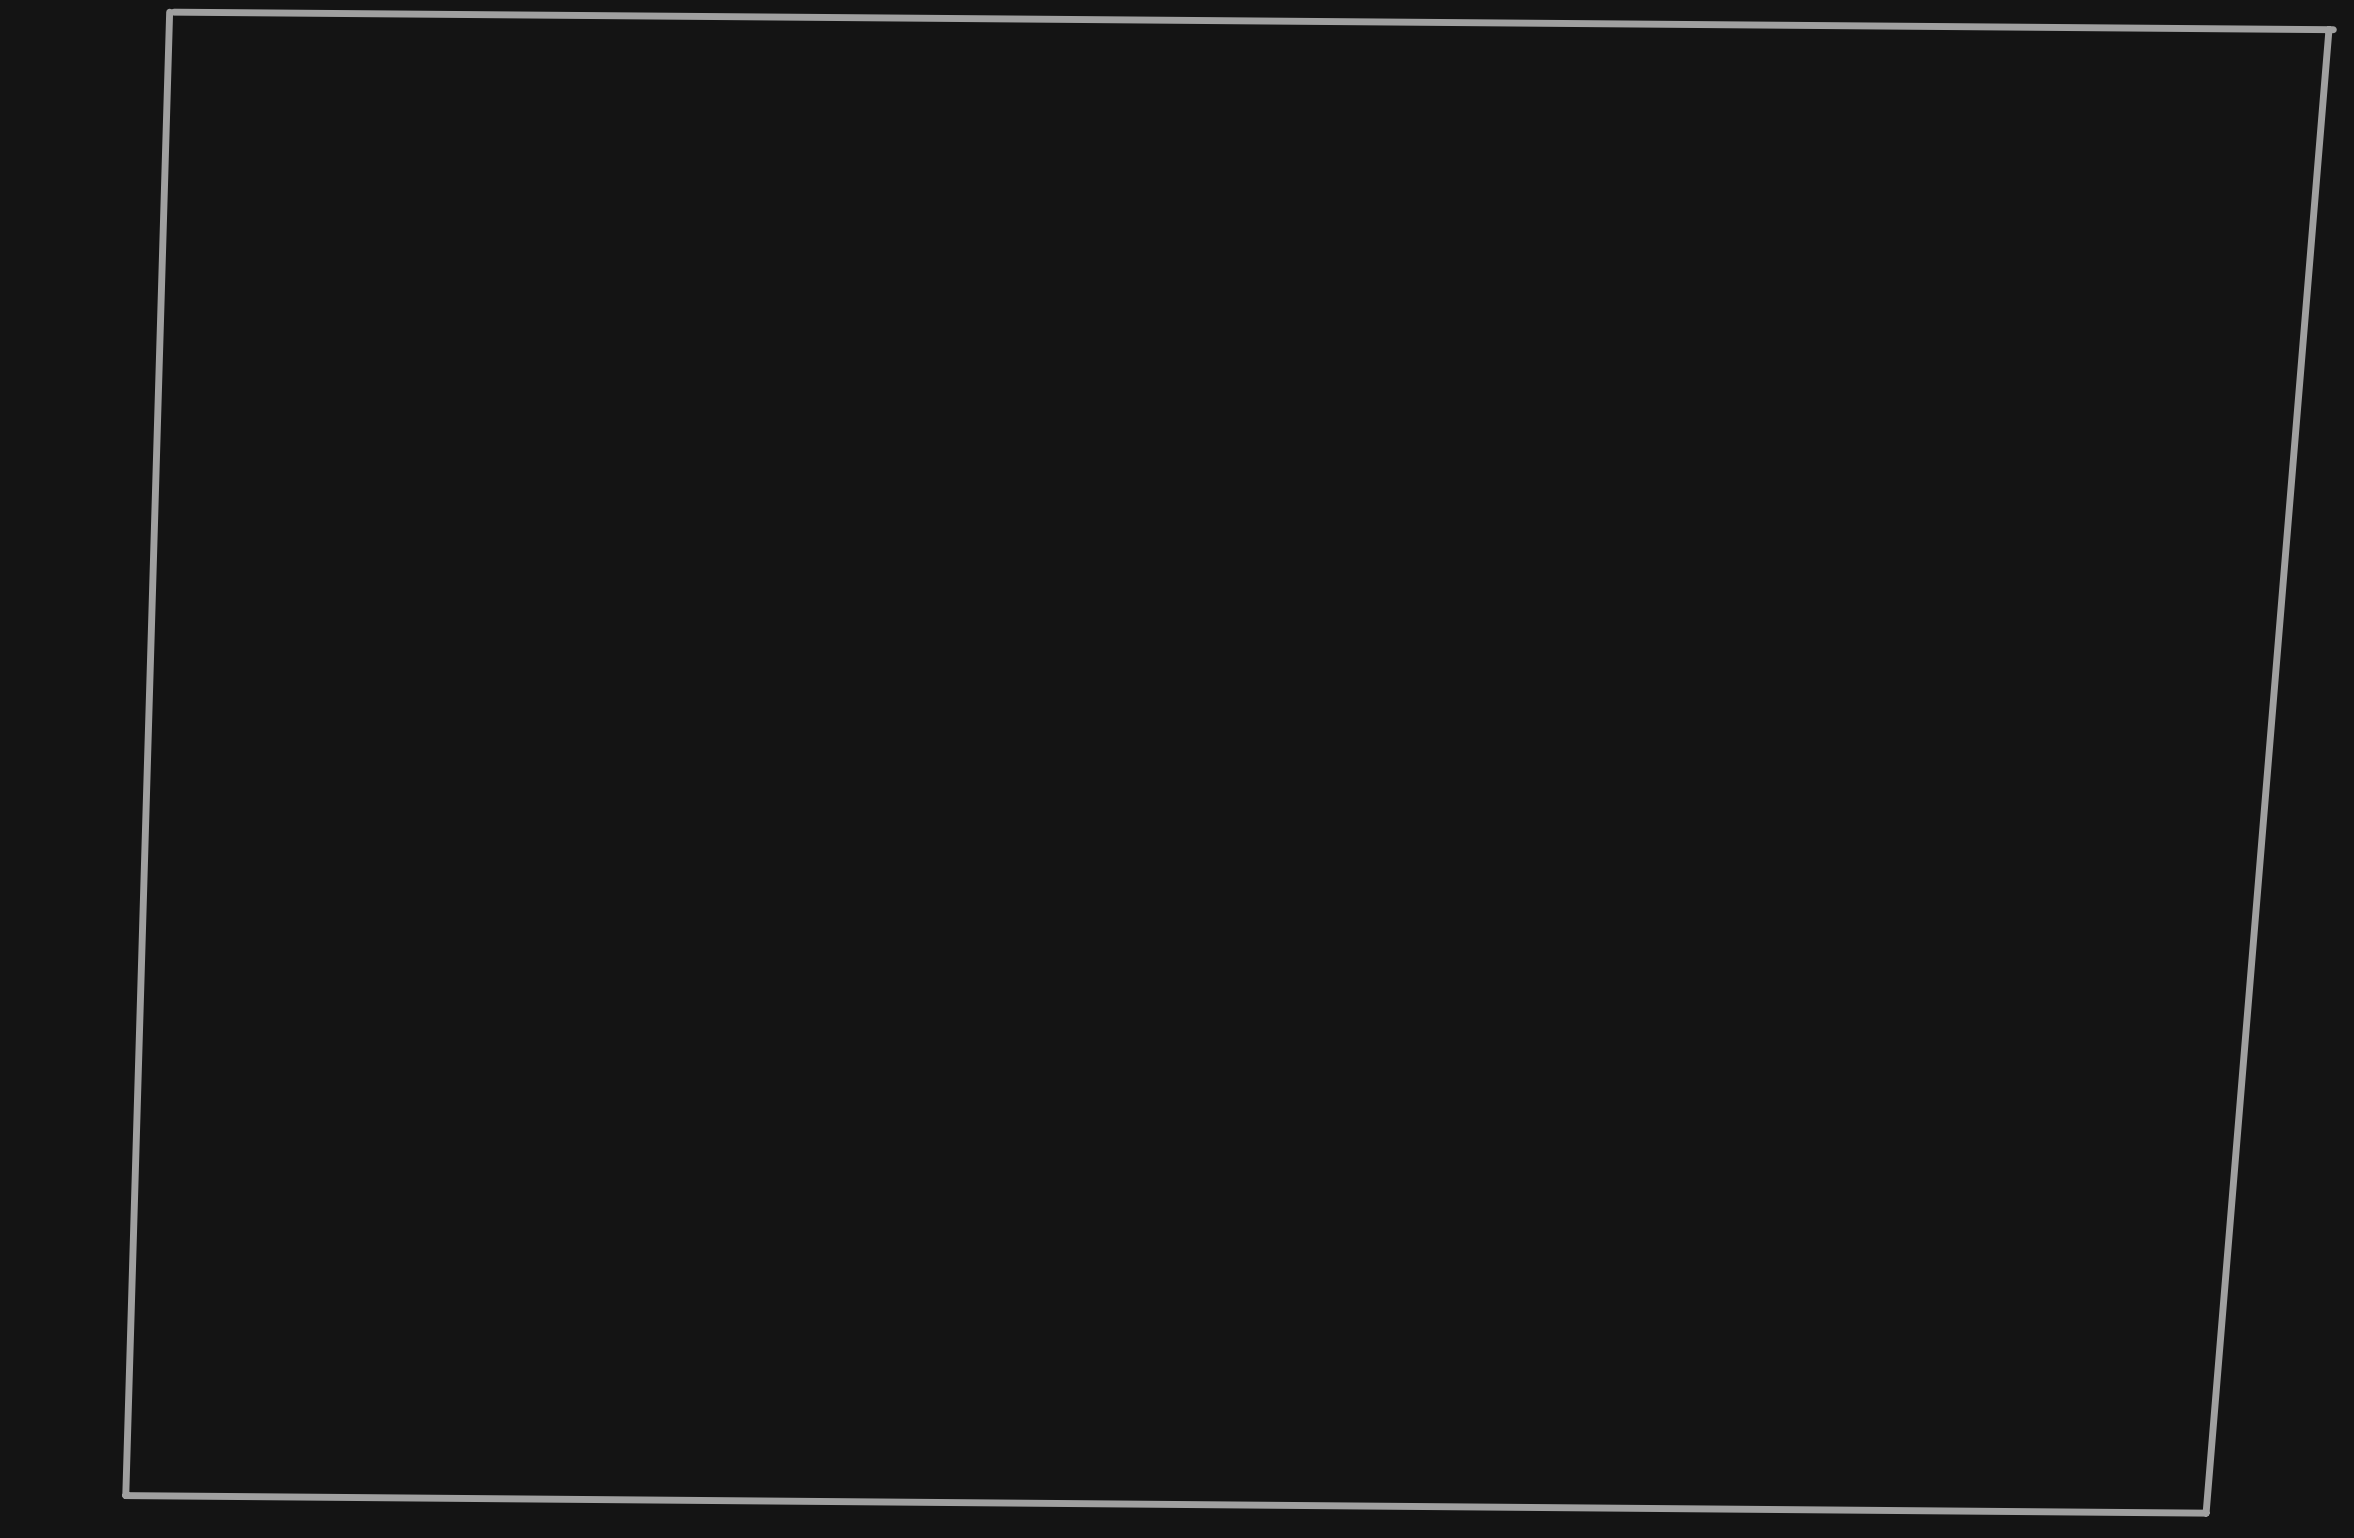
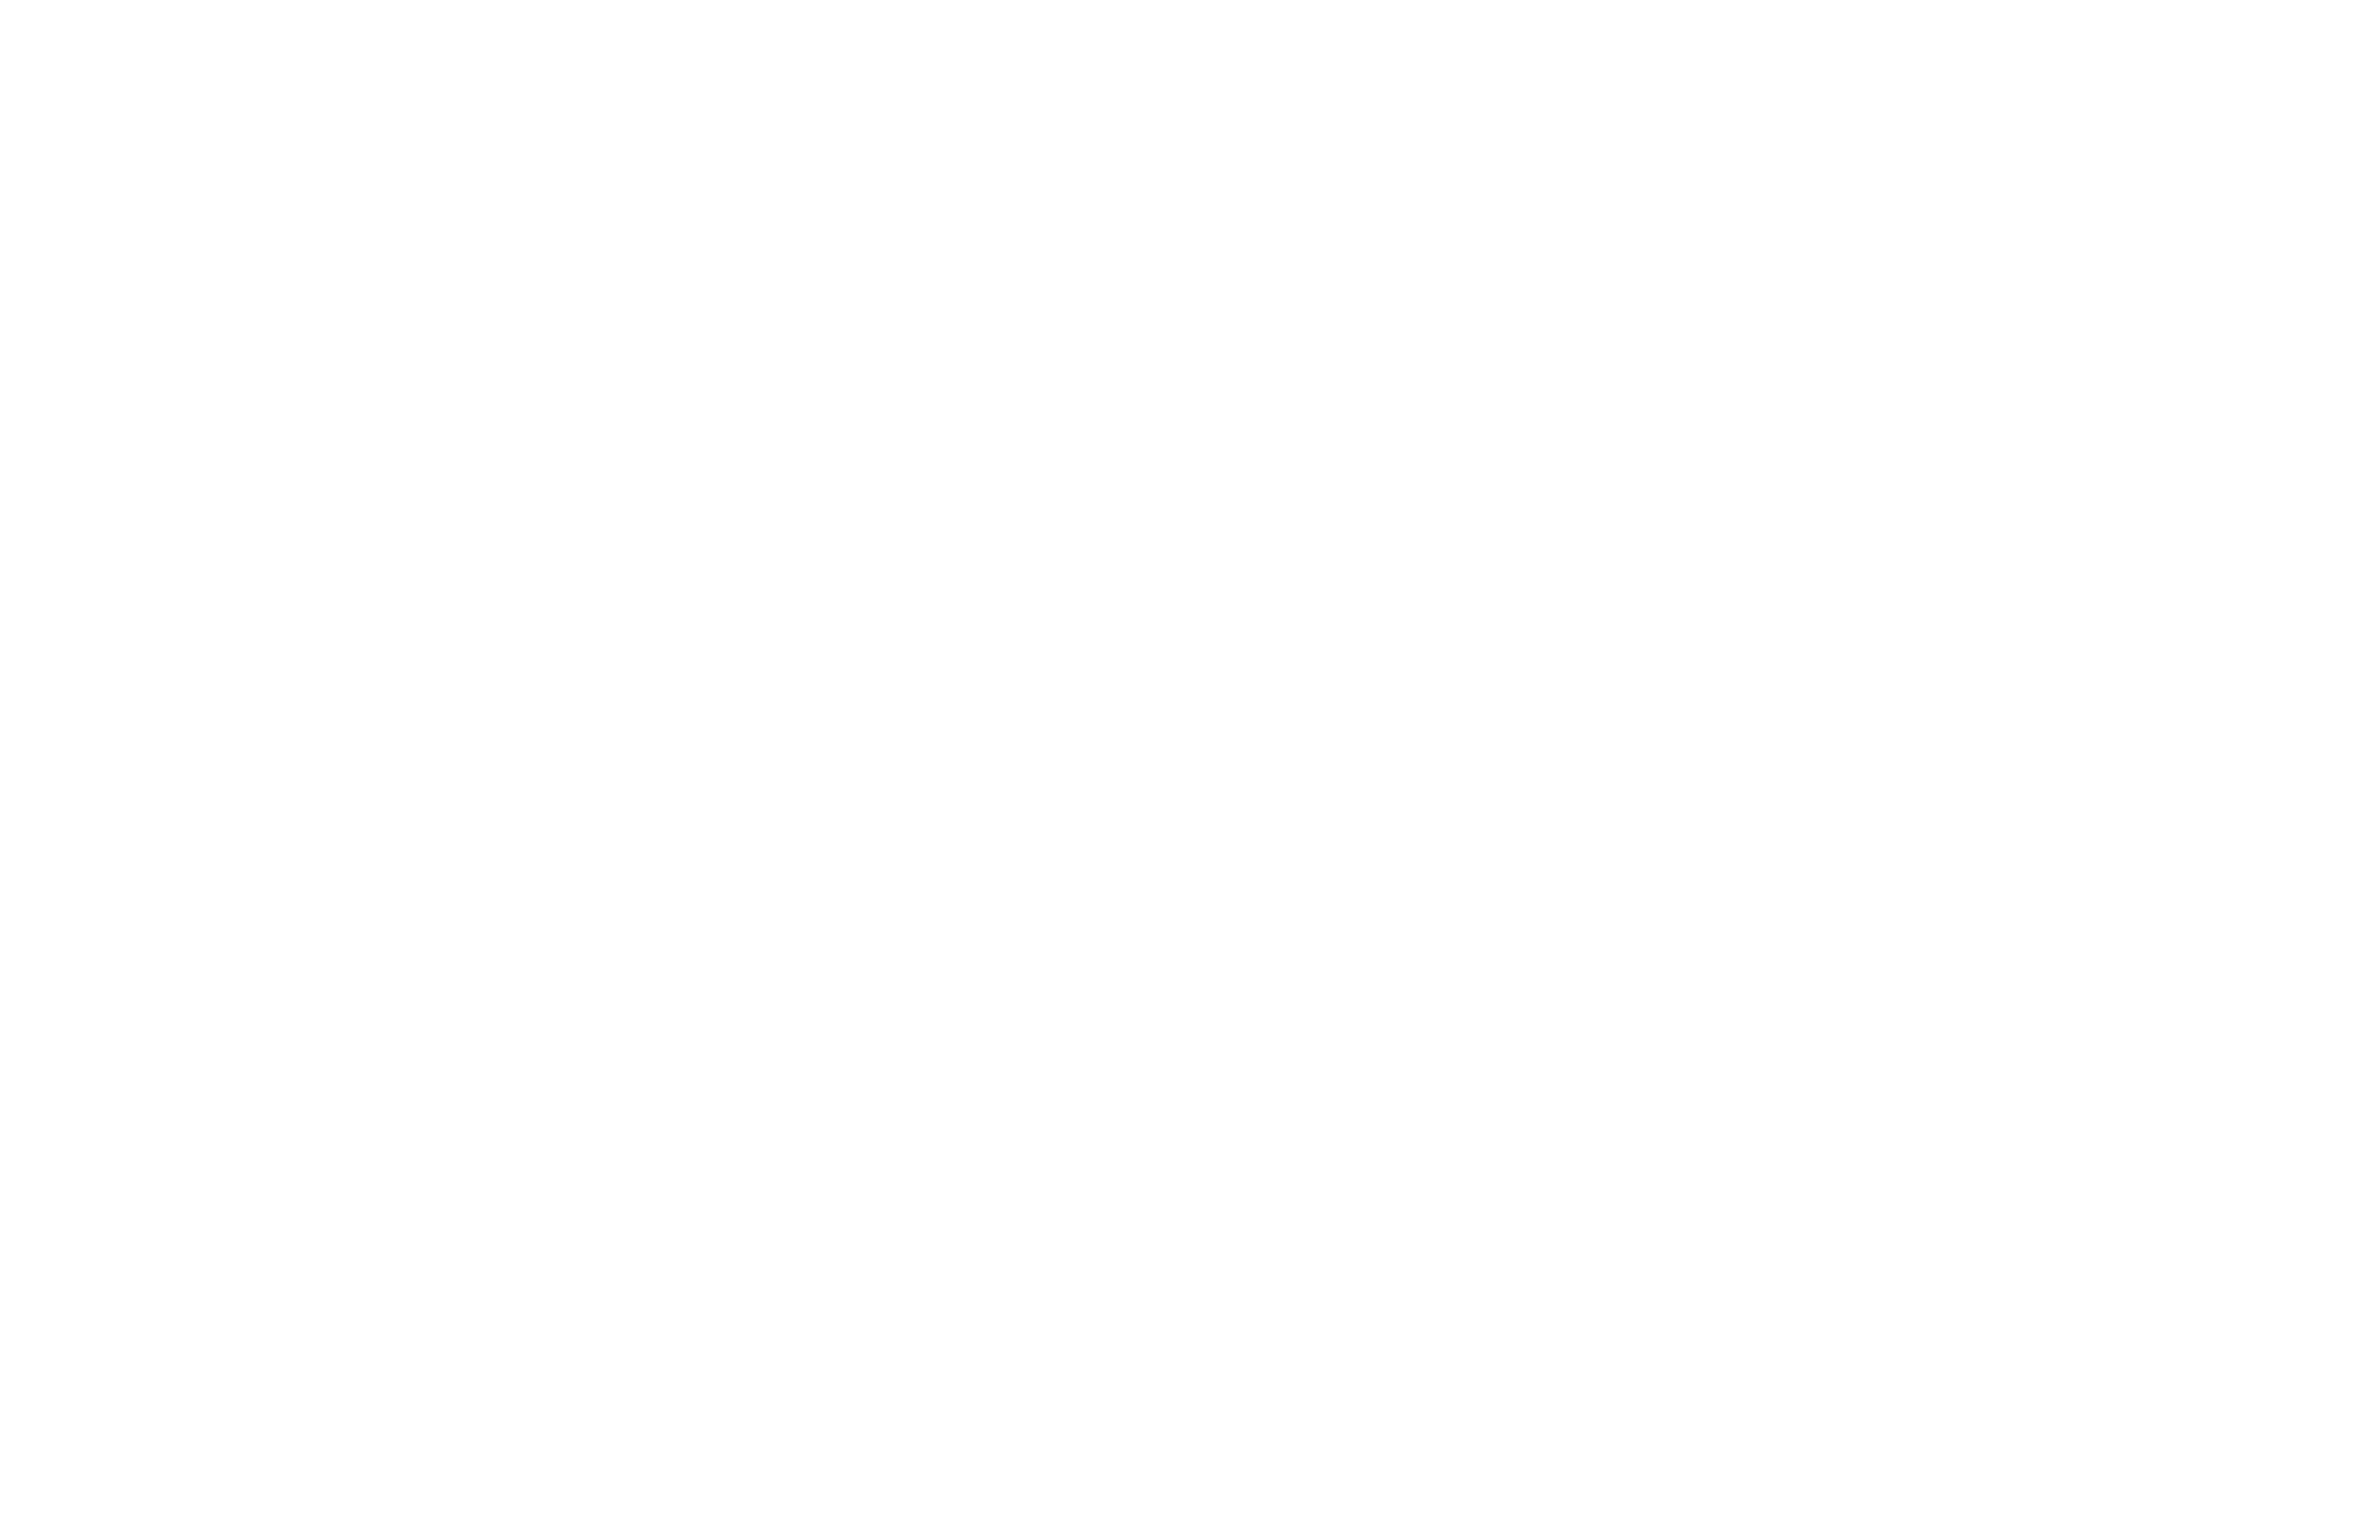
board edge: (169, 12) (125, 1495) (2206, 1513) (2328, 29) -> none
board edge: (174, 12) (2333, 29) -> none

